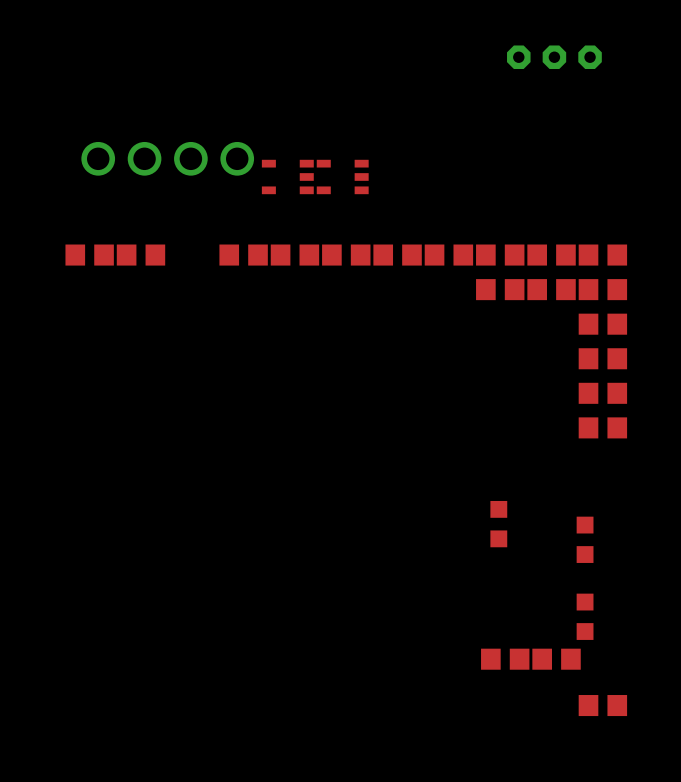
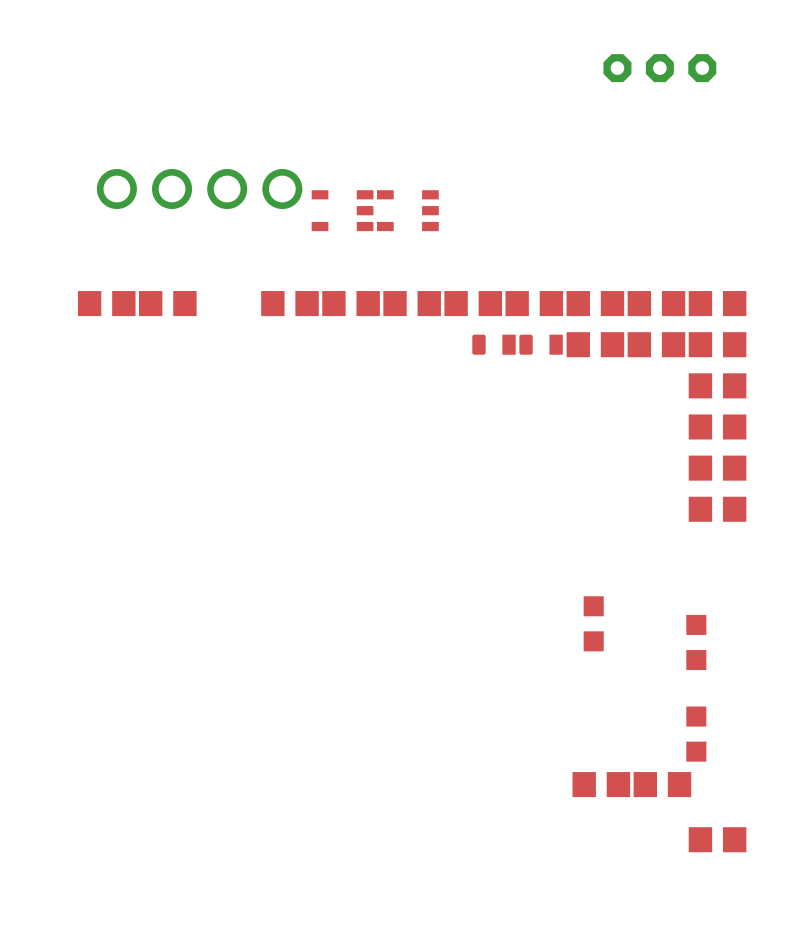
part: none -> (494, 344)
part: none -> (541, 344)

